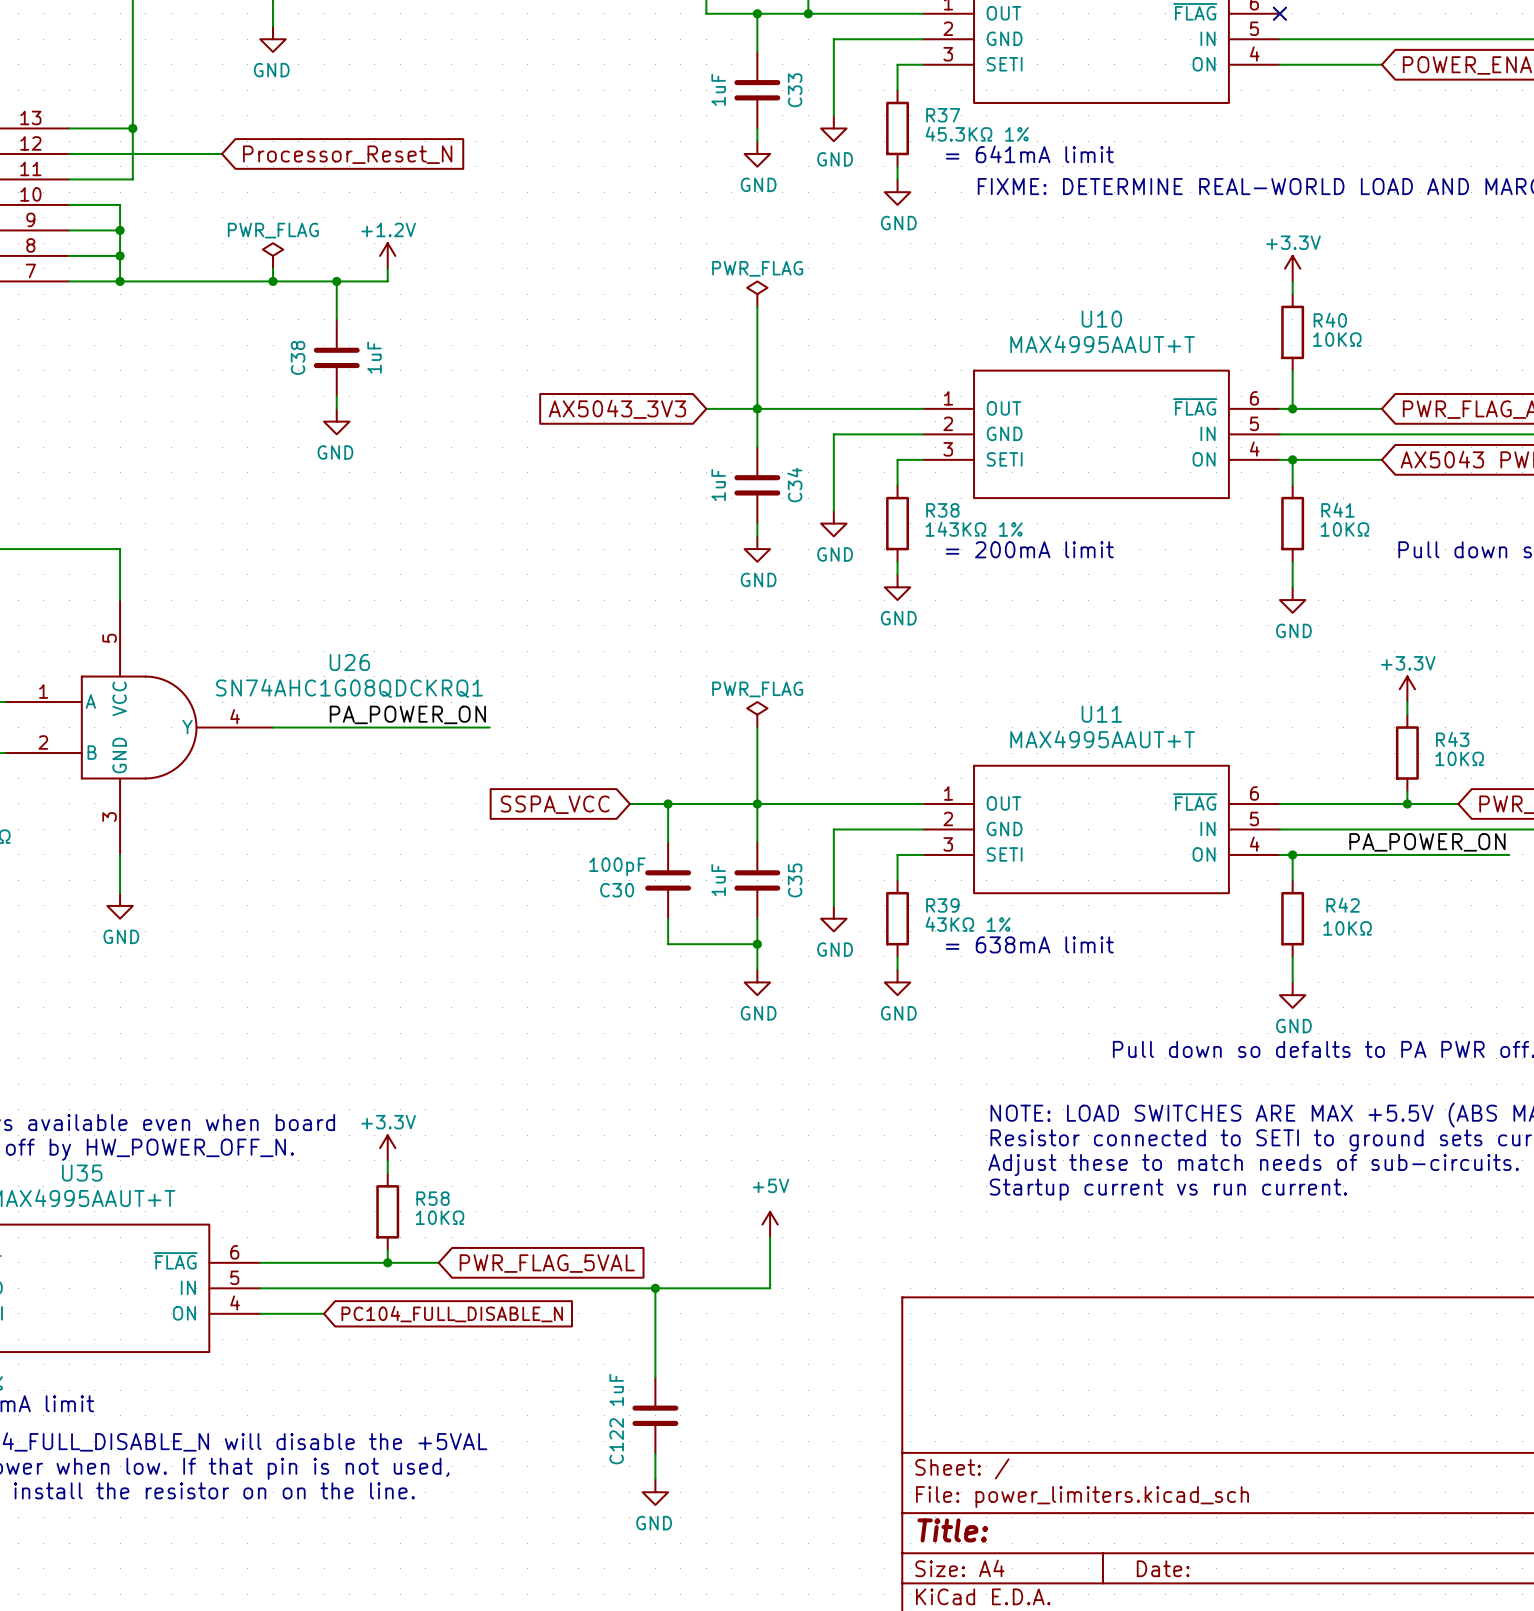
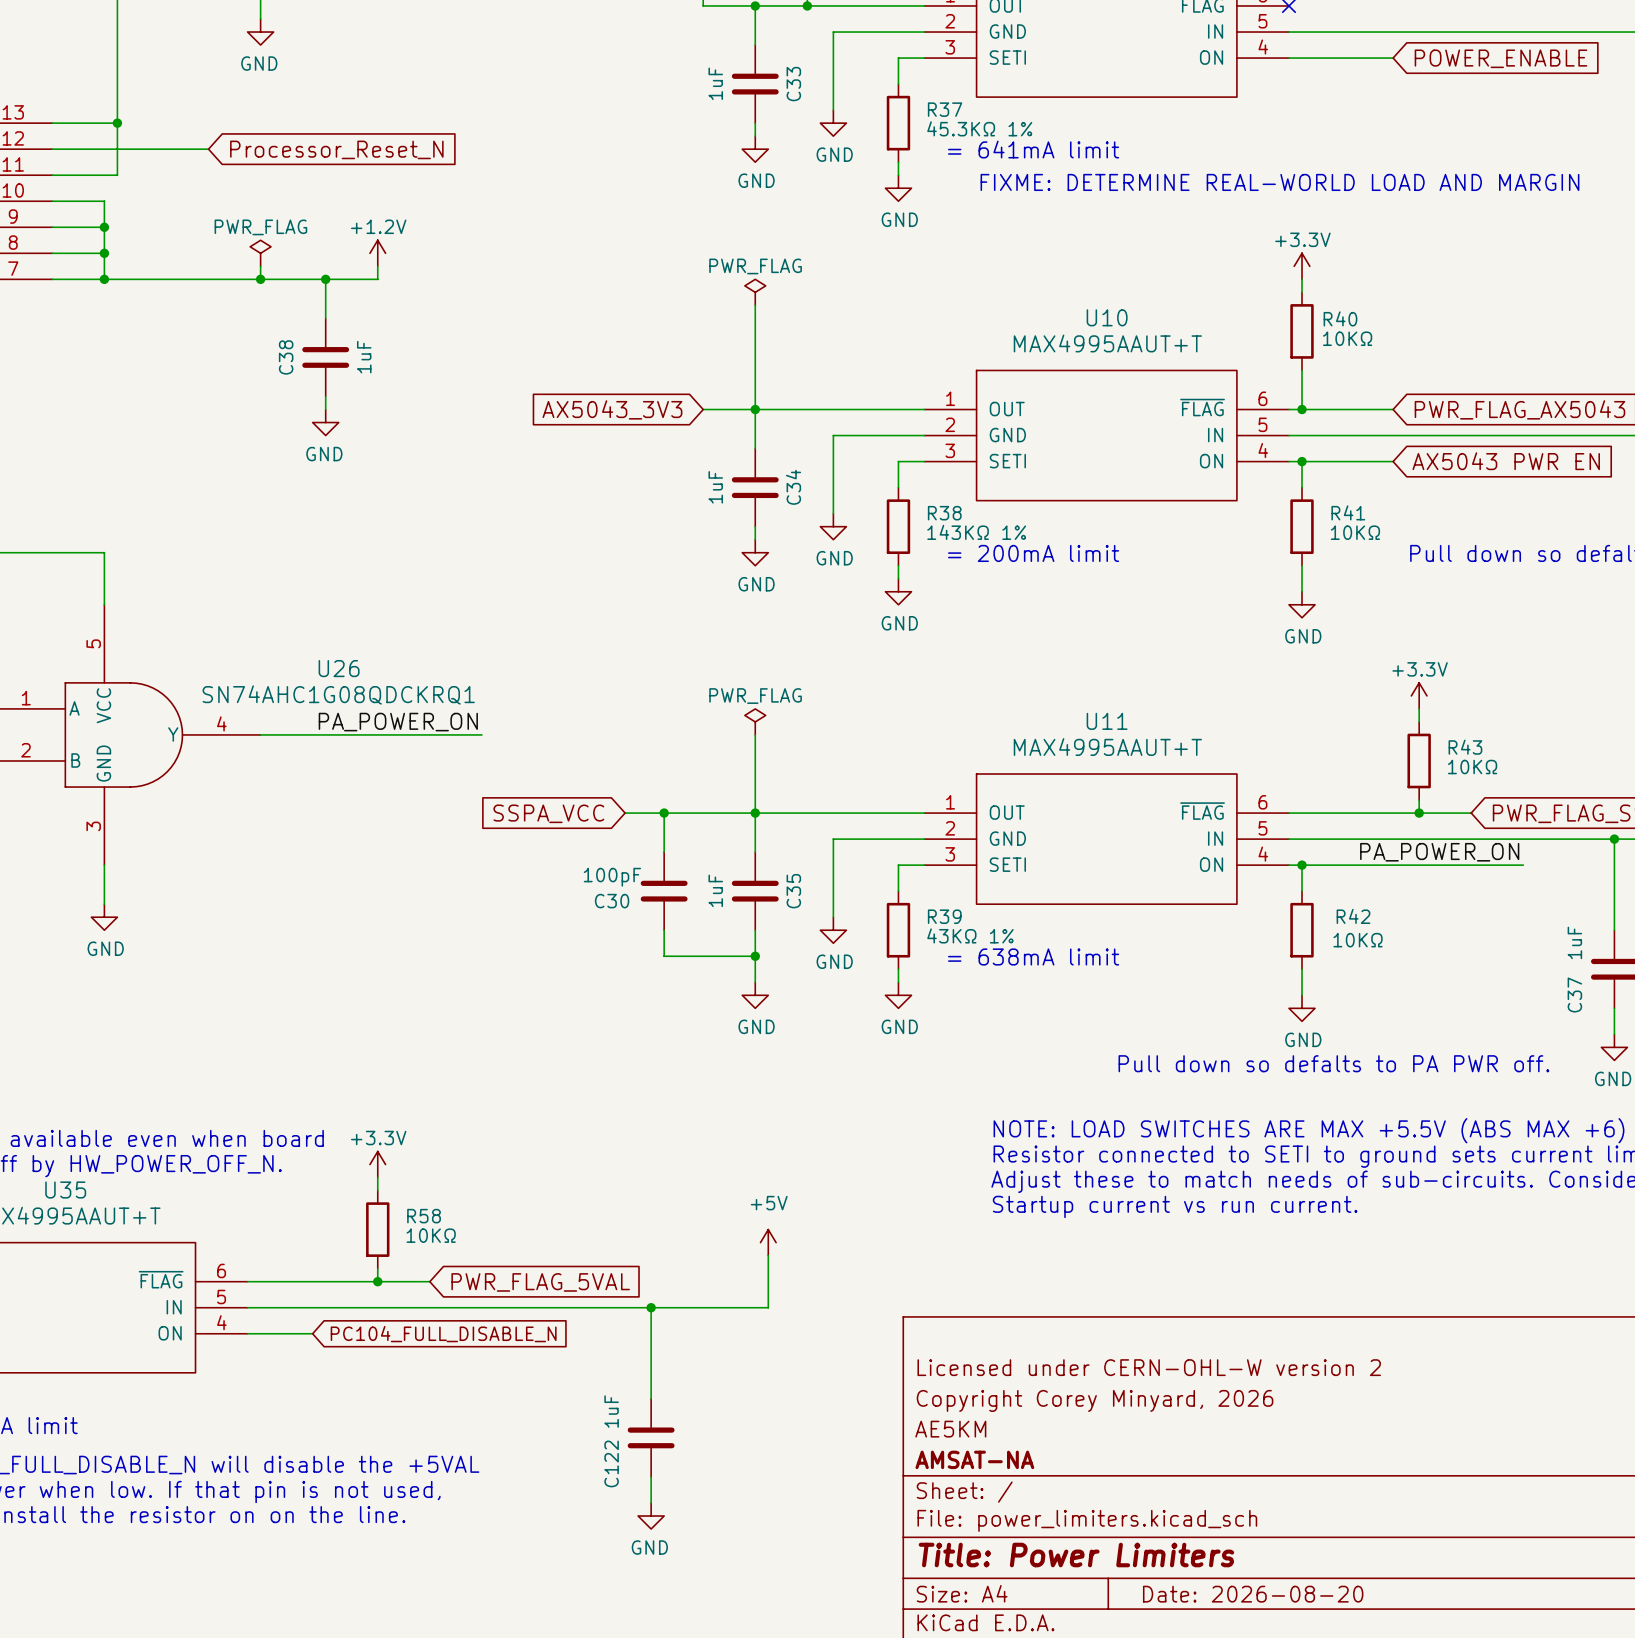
title block: none -> Licensed under CERN-OHL-W version 2 (1149, 1367)
title block: none -> Copyright Corey Minyard, 2026 (1095, 1400)
title block: none -> AE5KM (950, 1429)
title block: none -> AMSAT-NA (974, 1459)
title block: Title: (952, 1530) -> Title: Power Limiters (1076, 1555)
title block: Date: (1163, 1568) -> Date: 2026-08-20 (1253, 1594)

